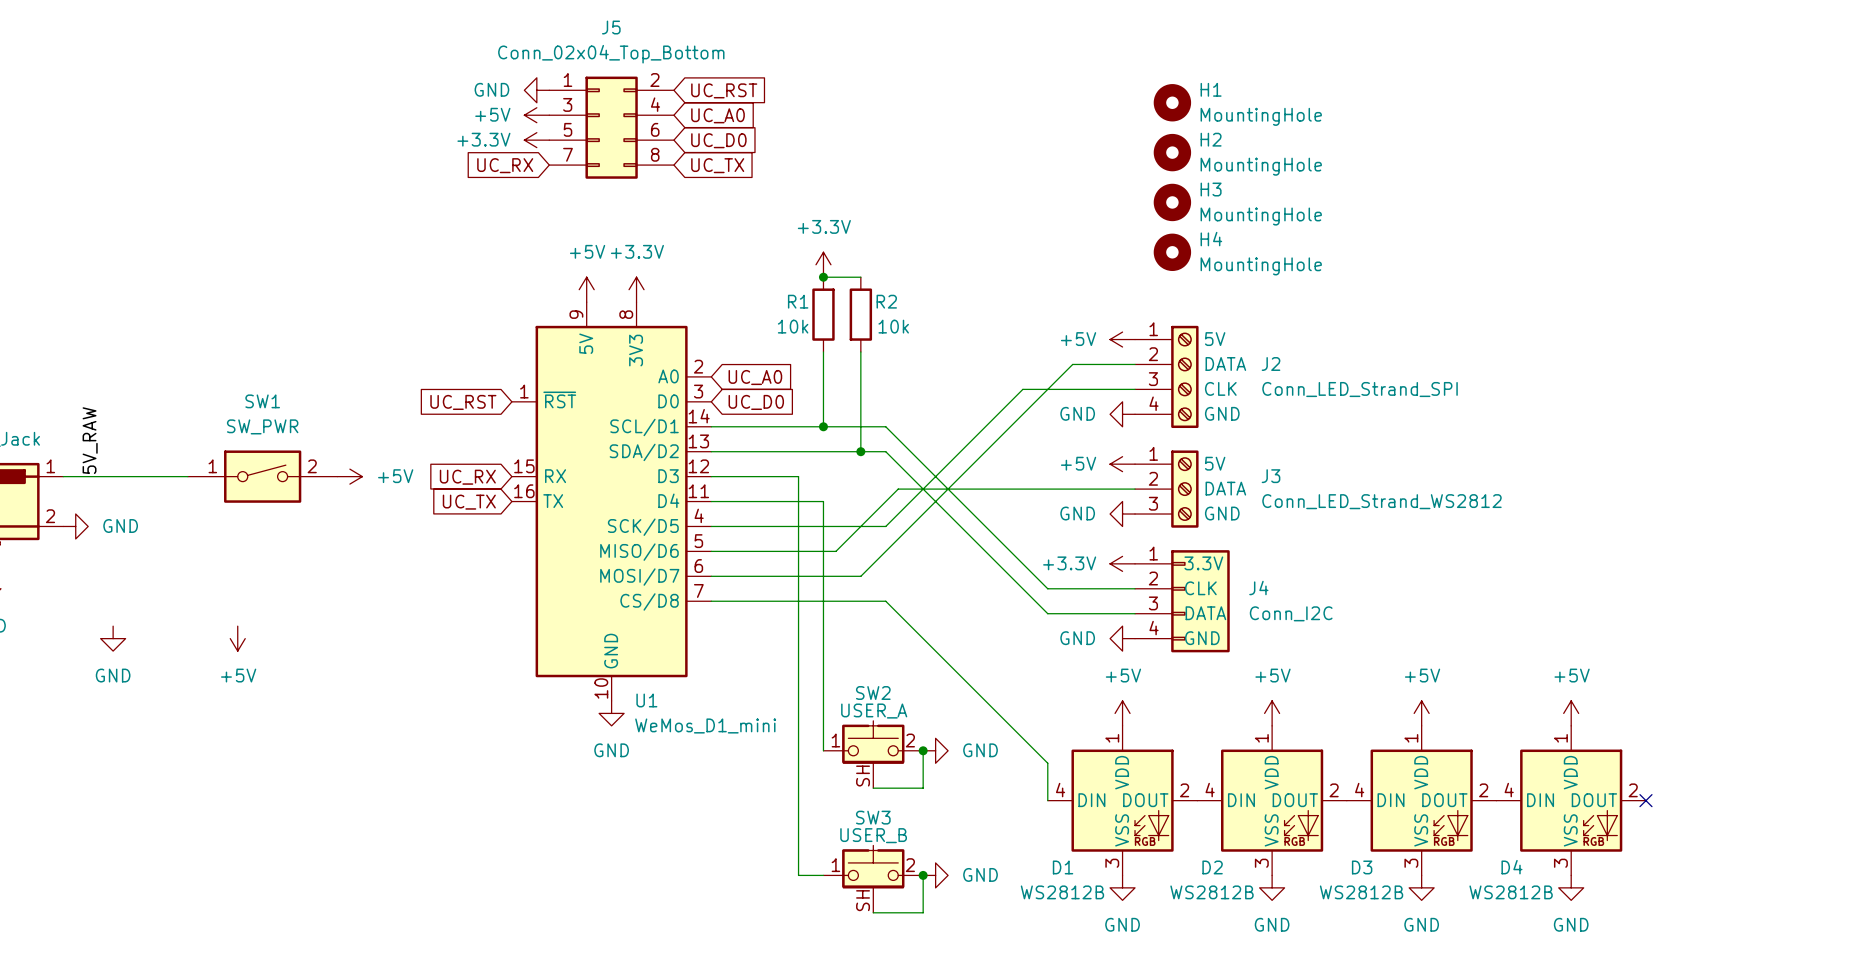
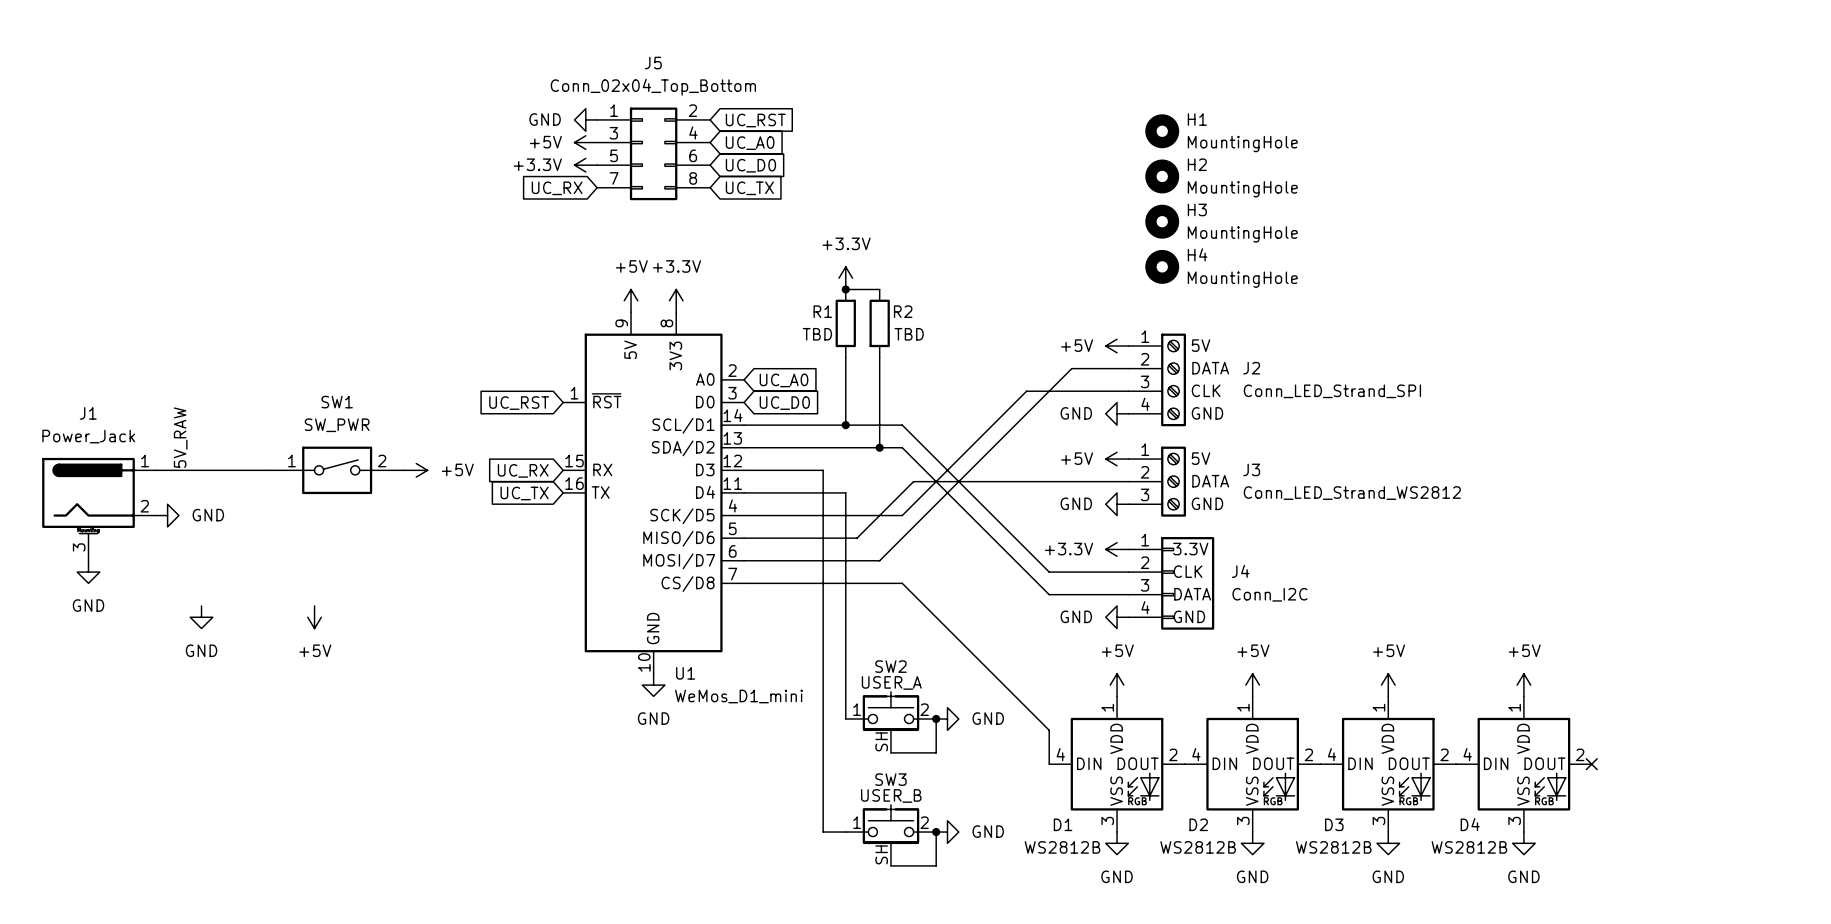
R1 value: 10k (793, 326) -> TBD (817, 334)
R2 value: 10k (893, 326) -> TBD (909, 334)

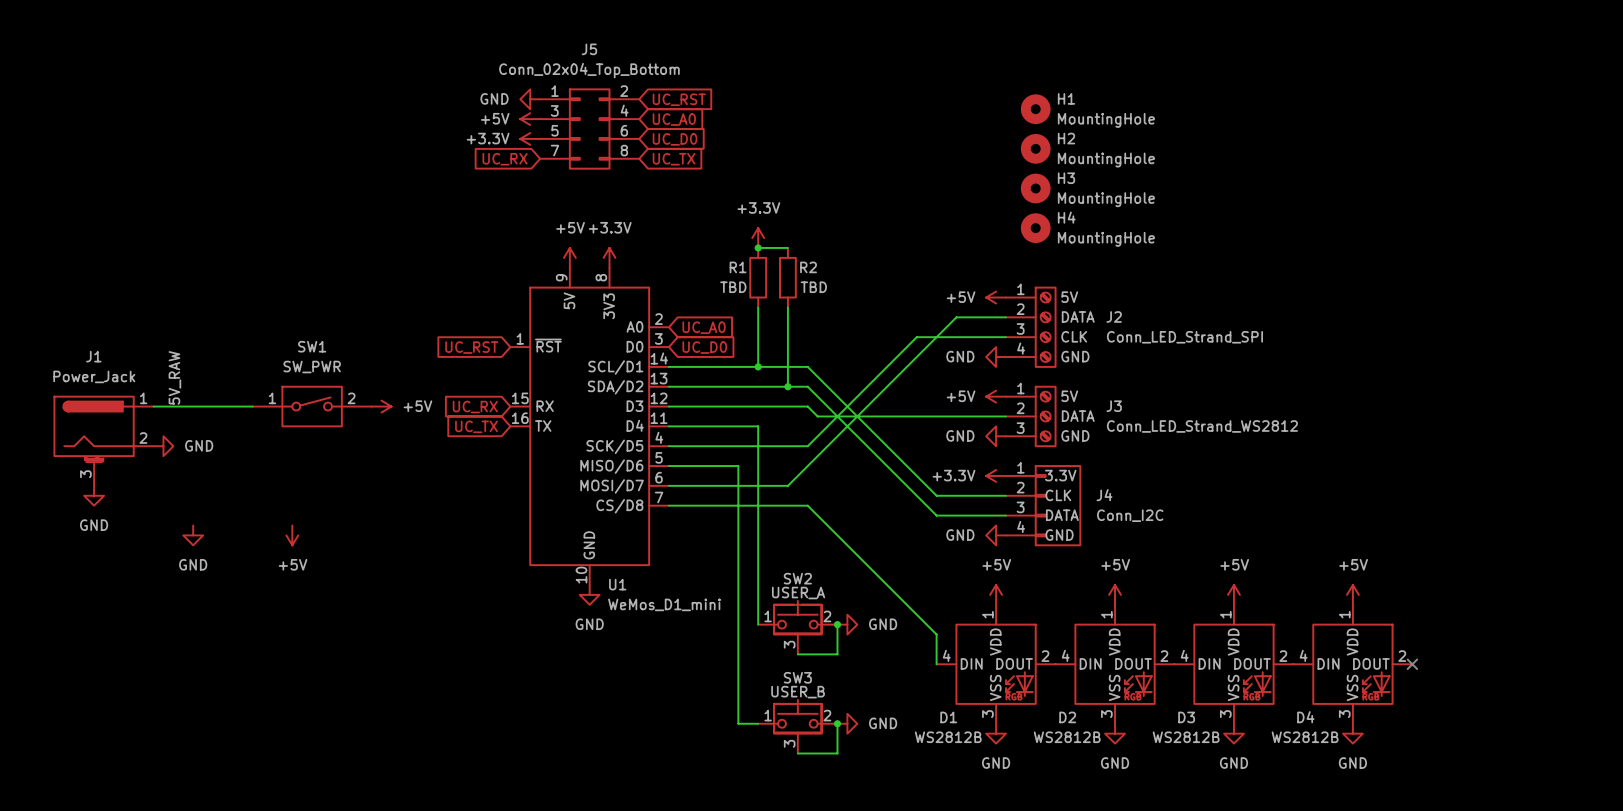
wire: (823, 470) (823, 538) (857, 538) (913, 481) -> (738, 406) (807, 406) (817, 416)
SW2 pin number: SH (881, 741) -> 3 (789, 644)
SW3 pin number: SH (881, 854) -> 3 (789, 743)

